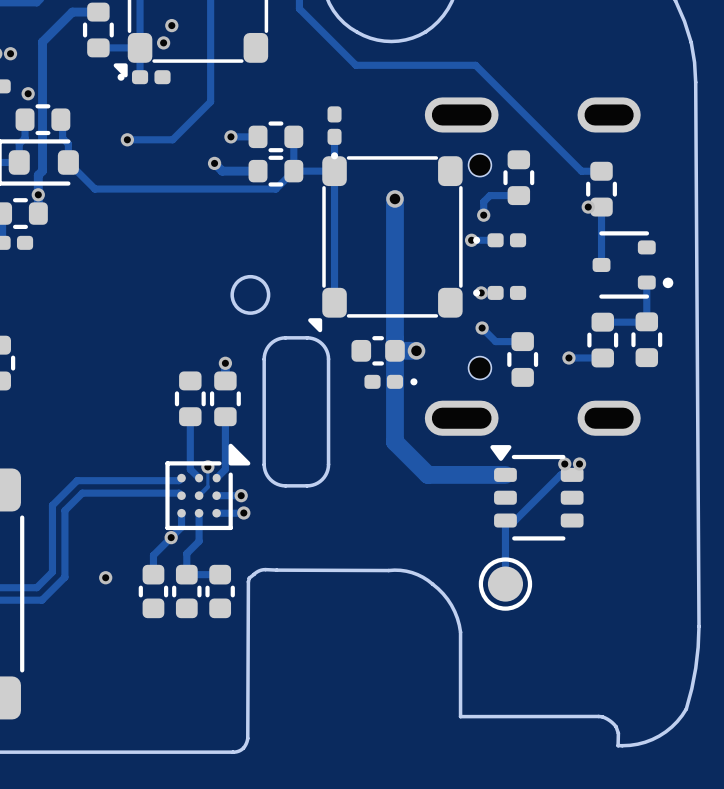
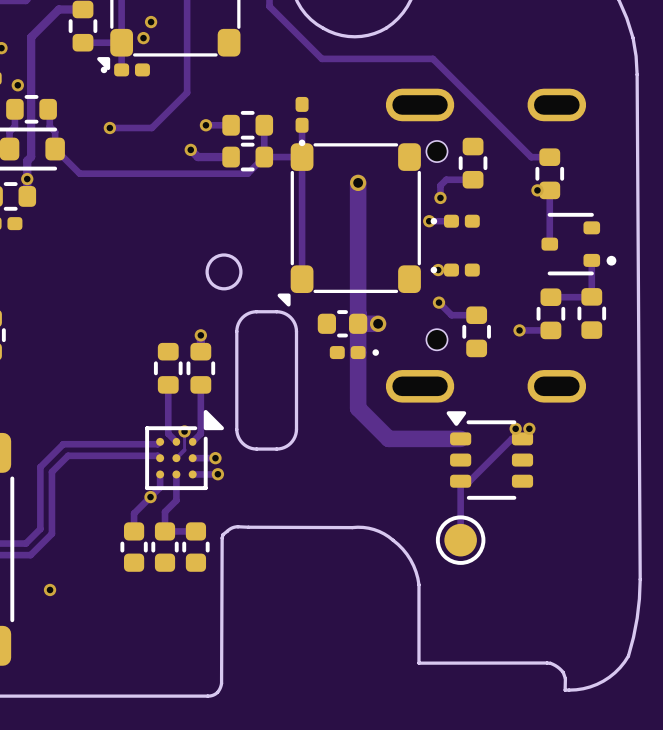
via position: (105, 577) -> (50, 589)

